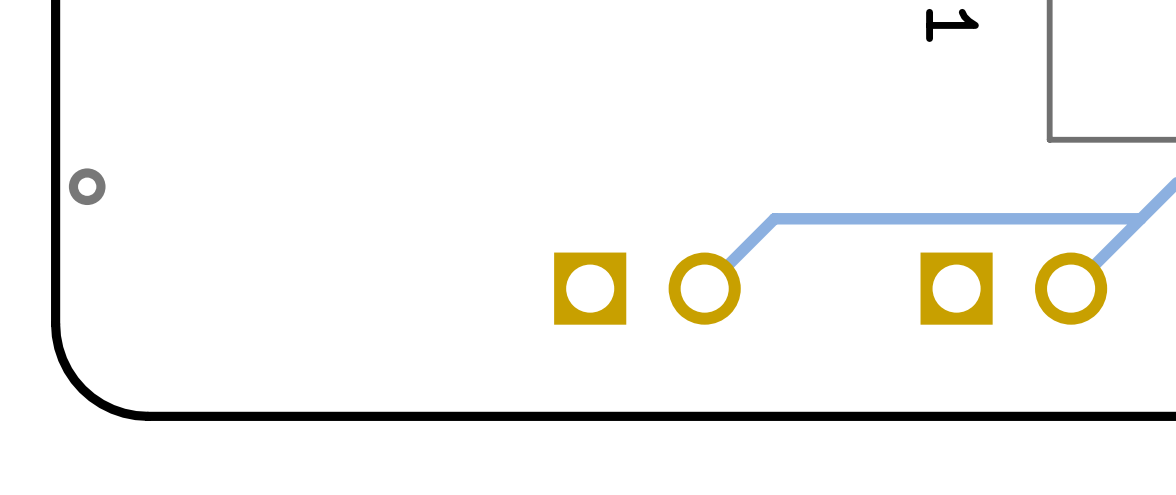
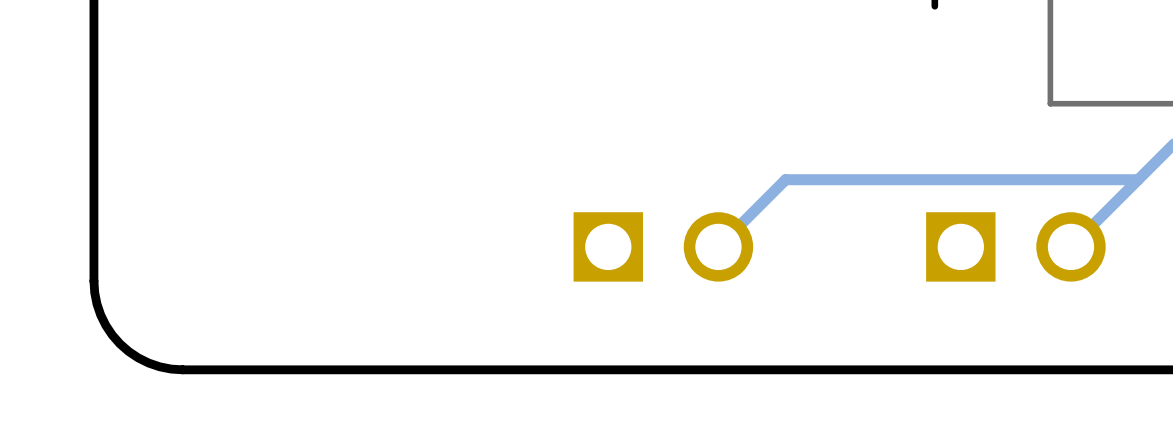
via: (87, 186) -> none

